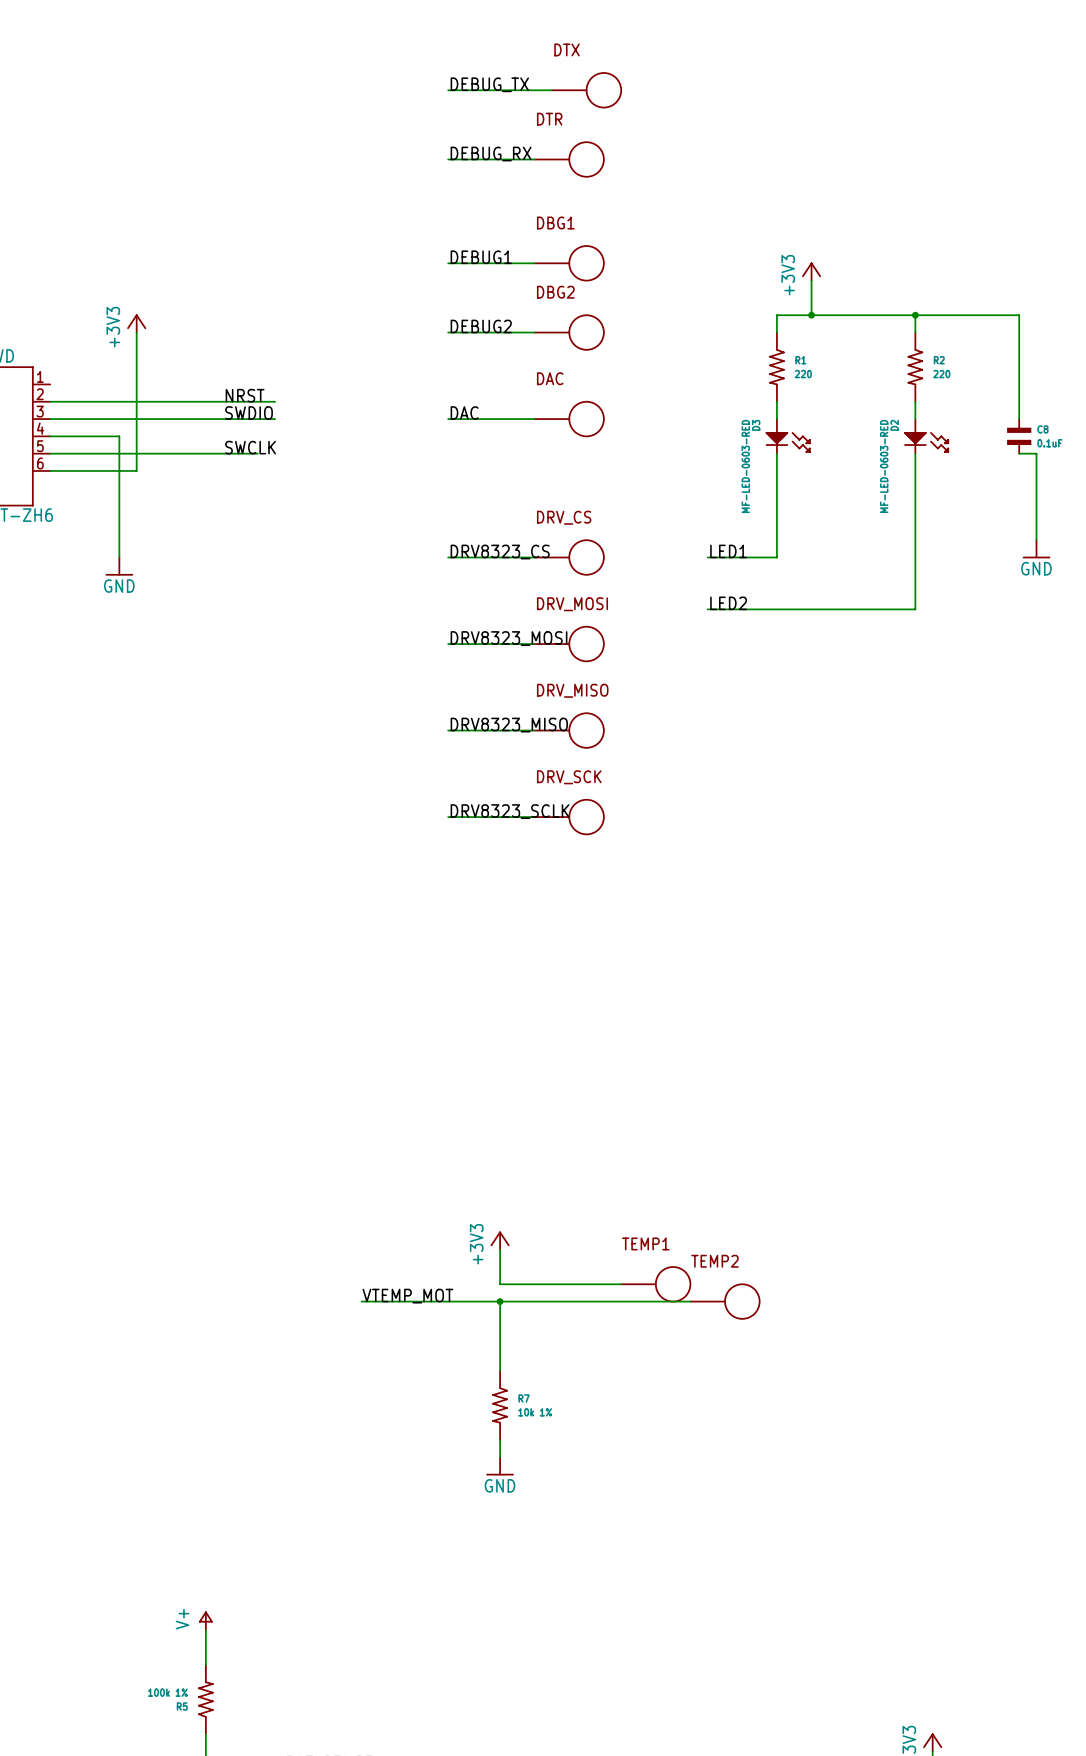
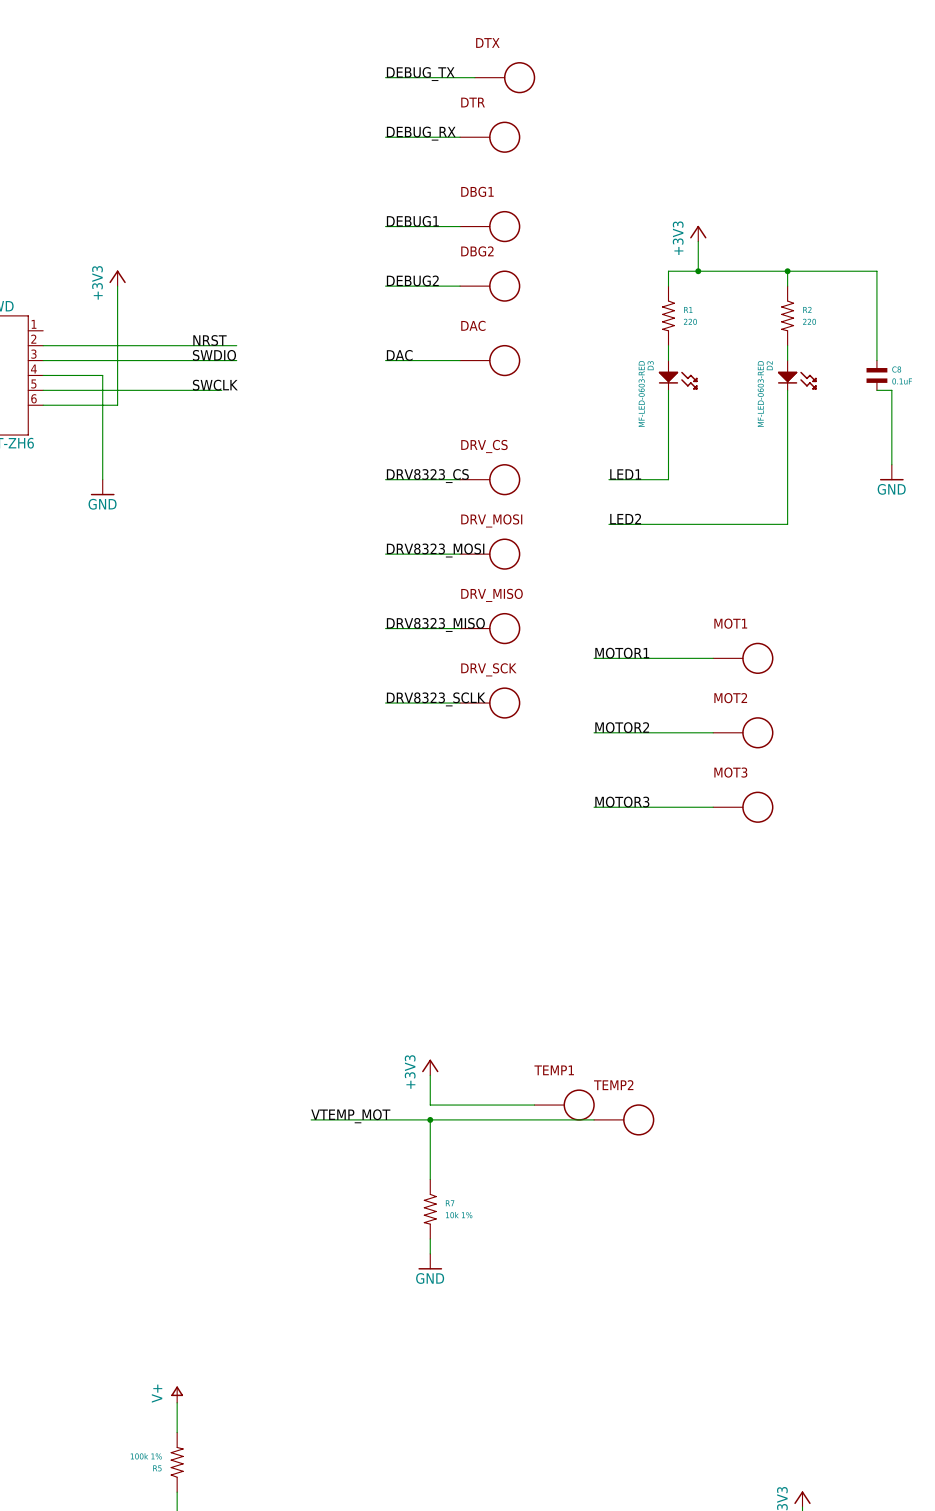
label: none -> MOTOR1 (622, 653)
wire: none -> (594, 658) (713, 658)
MOT1: none -> (743, 658)
label: none -> MOTOR2 (622, 727)
wire: none -> (594, 732) (713, 732)
MOT2: none -> (743, 732)
label: none -> MOTOR3 (622, 802)
wire: none -> (594, 807) (713, 807)
MOT3: none -> (743, 807)

